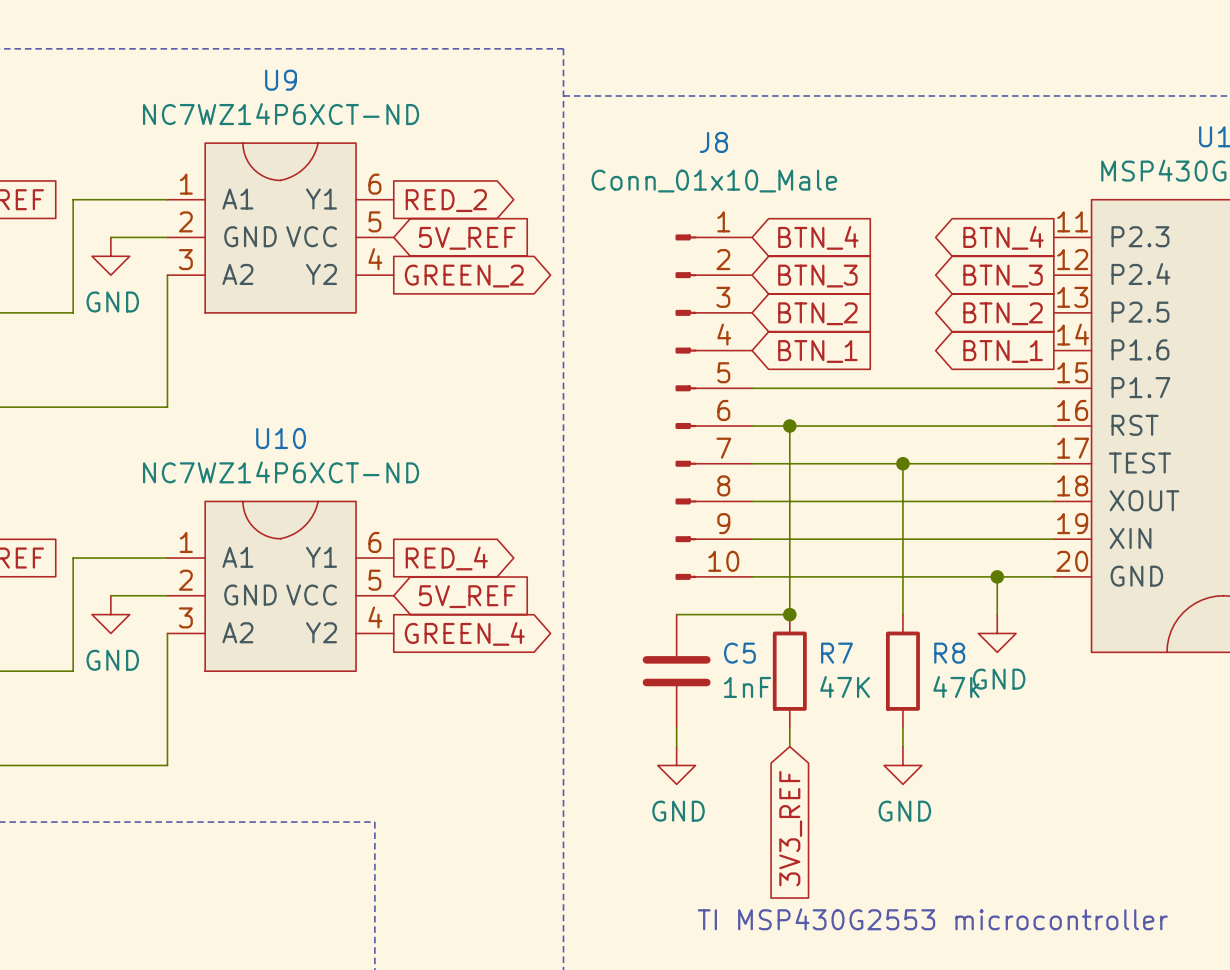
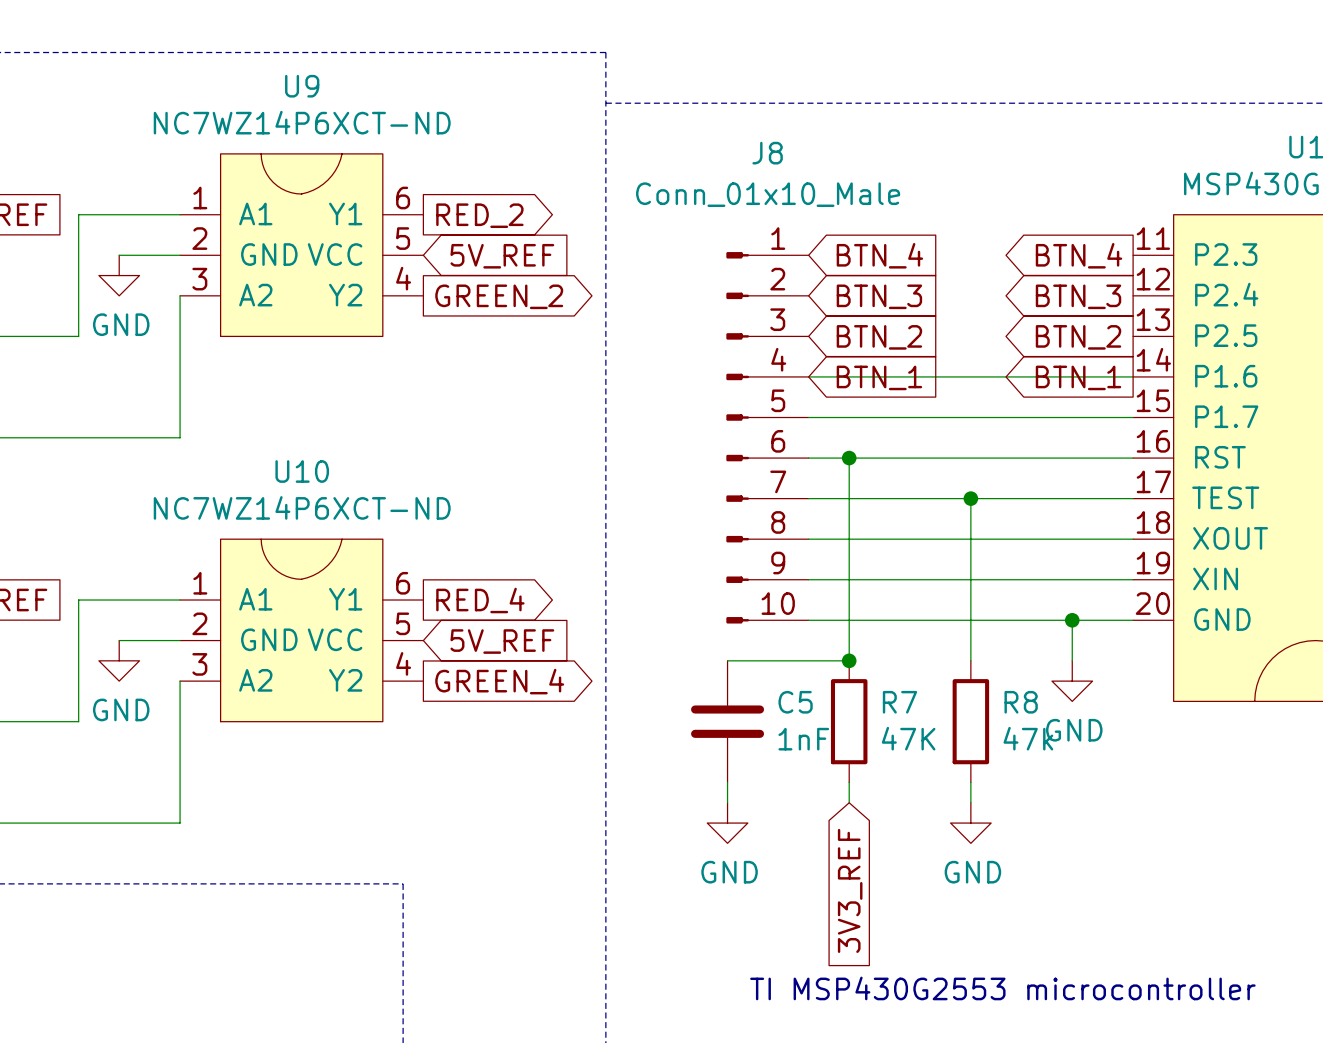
wire: none -> (808, 376) (1133, 376)

